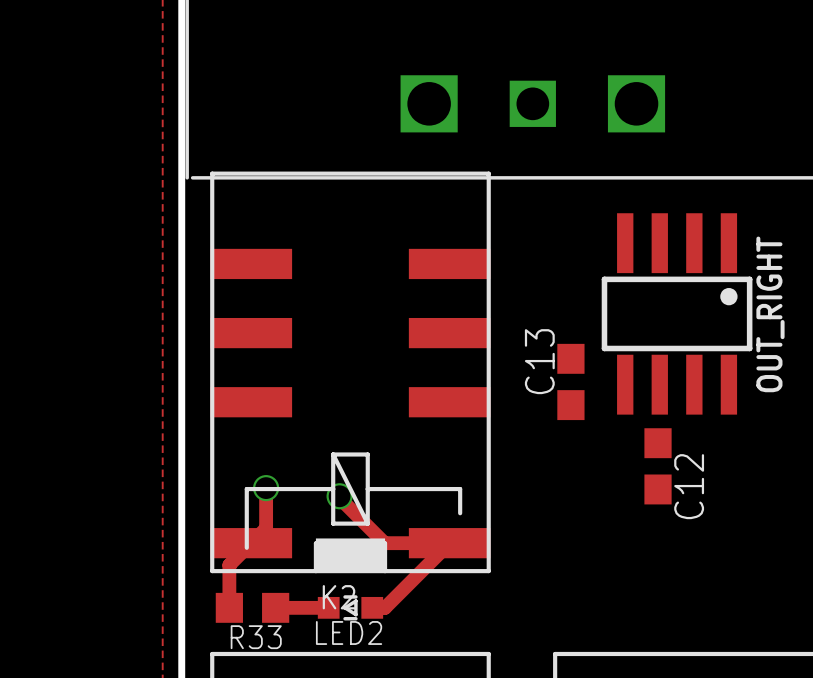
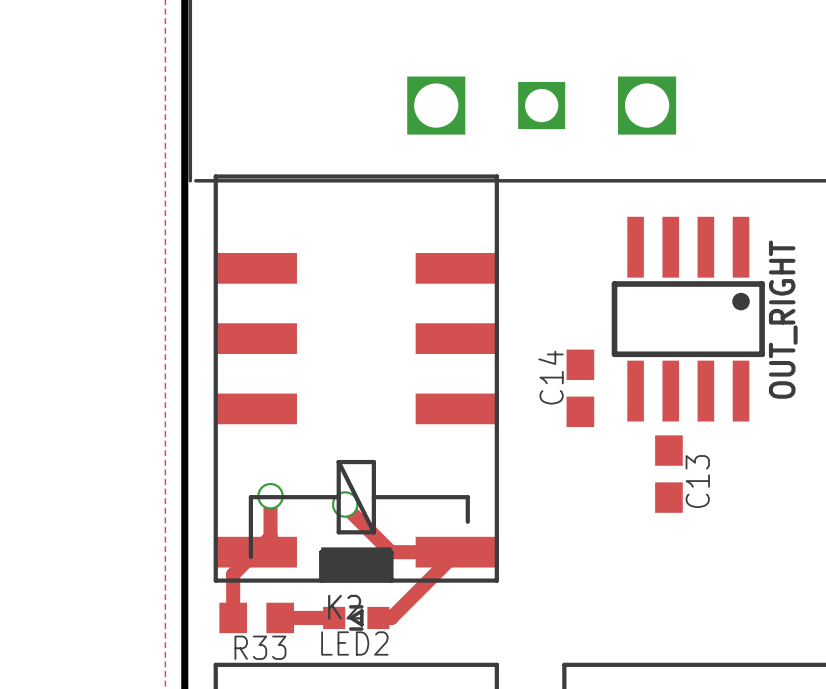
C13 name: C13 (539, 361) -> C14 (551, 377)
C12 name: C12 (689, 486) -> C13 (697, 481)

